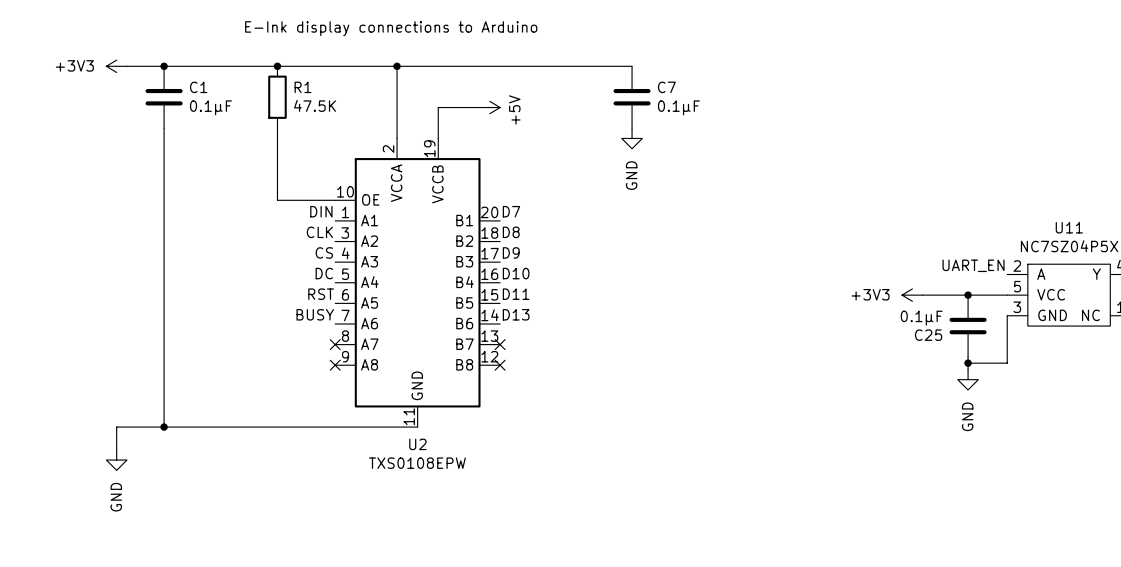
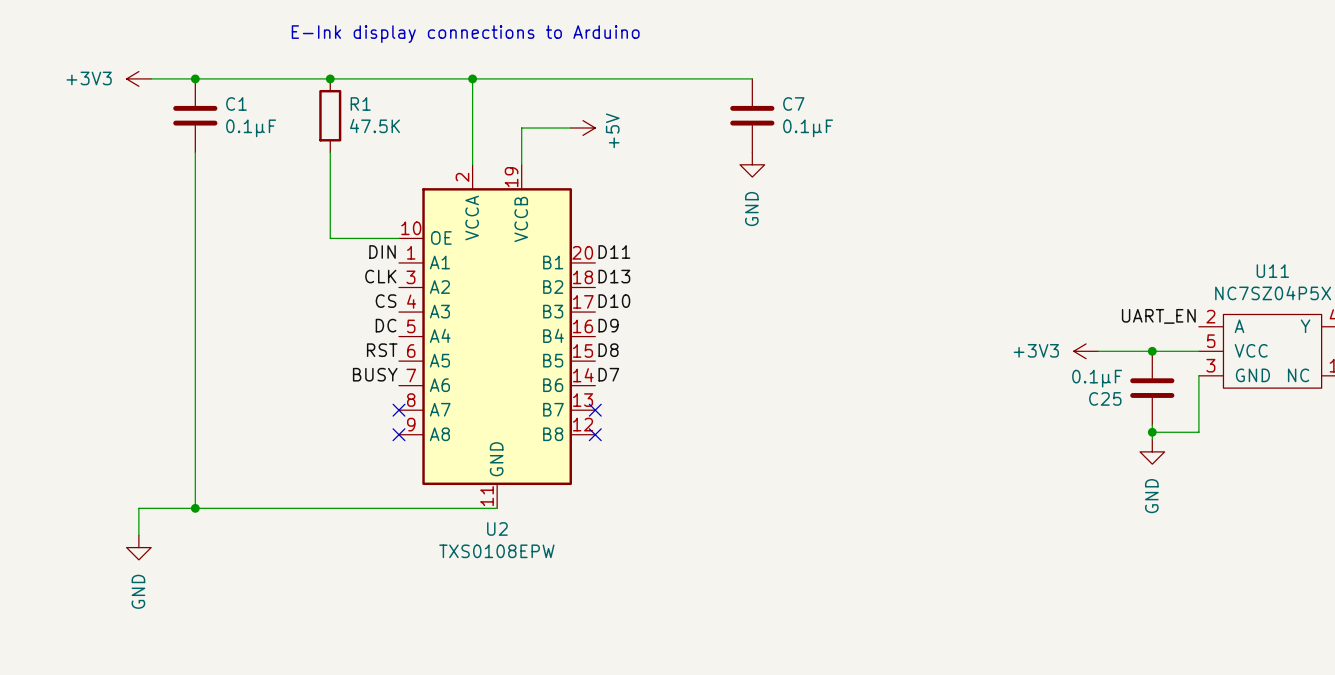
label: D7 (511, 211) -> D11 (614, 252)
label: D8 (511, 232) -> D13 (614, 276)
label: D9 (511, 252) -> D10 (614, 301)
label: D10 (516, 273) -> D9 (608, 325)
label: D11 (516, 294) -> D8 (608, 350)
label: D13 (516, 314) -> D7 (608, 374)

